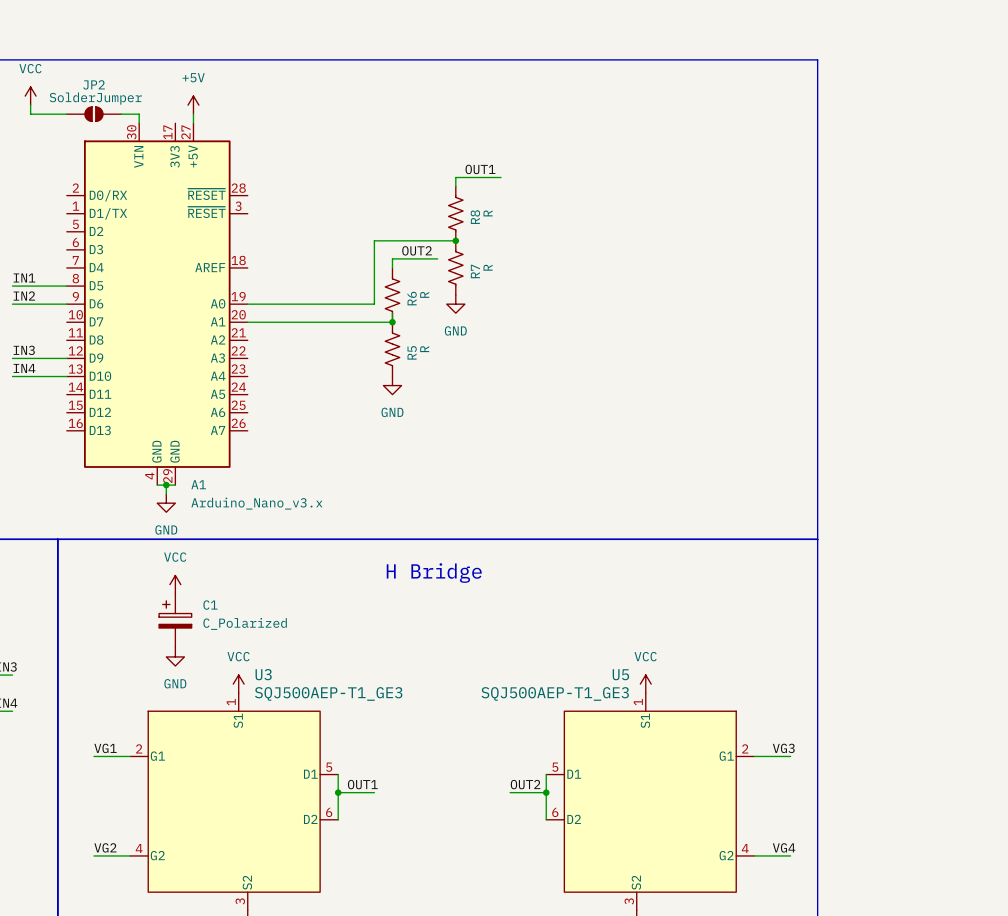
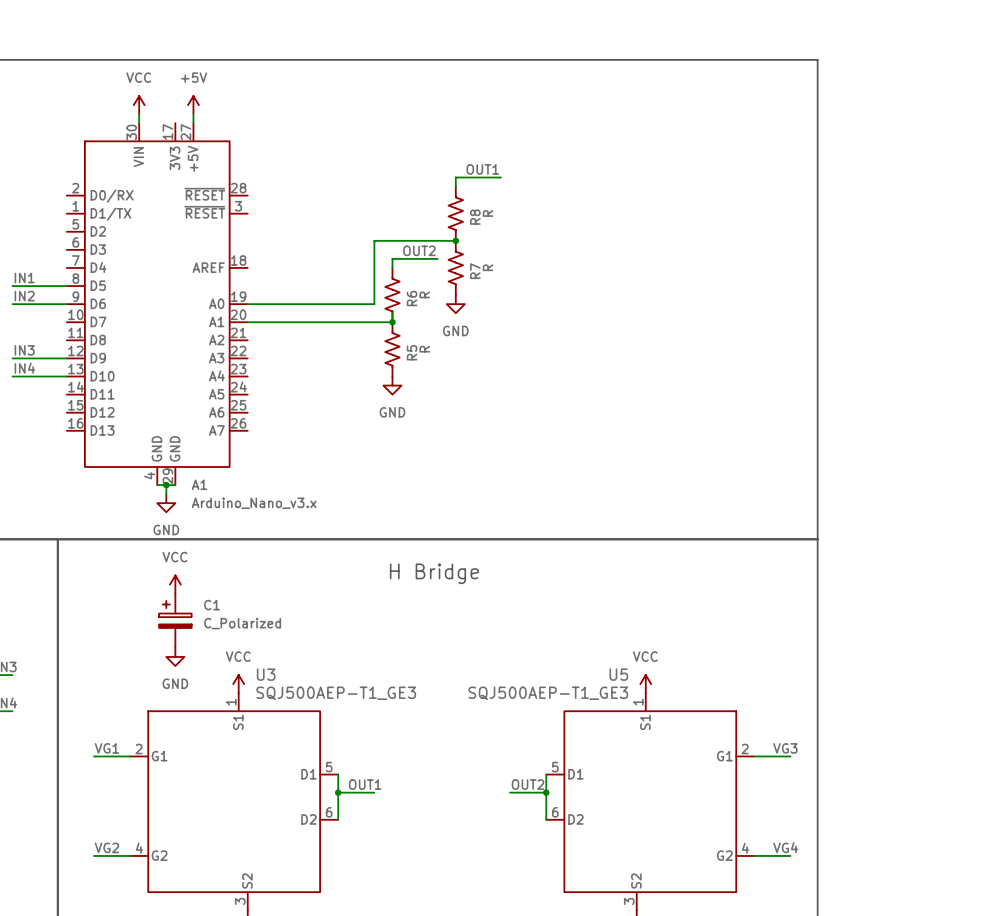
power symbol position: VCC (30, 96) -> VCC (139, 105)
wire: (30, 105) (30, 114) (66, 114) -> none
JP2: SolderJumper (93, 114) -> none
wire: (121, 114) (139, 114) -> none

